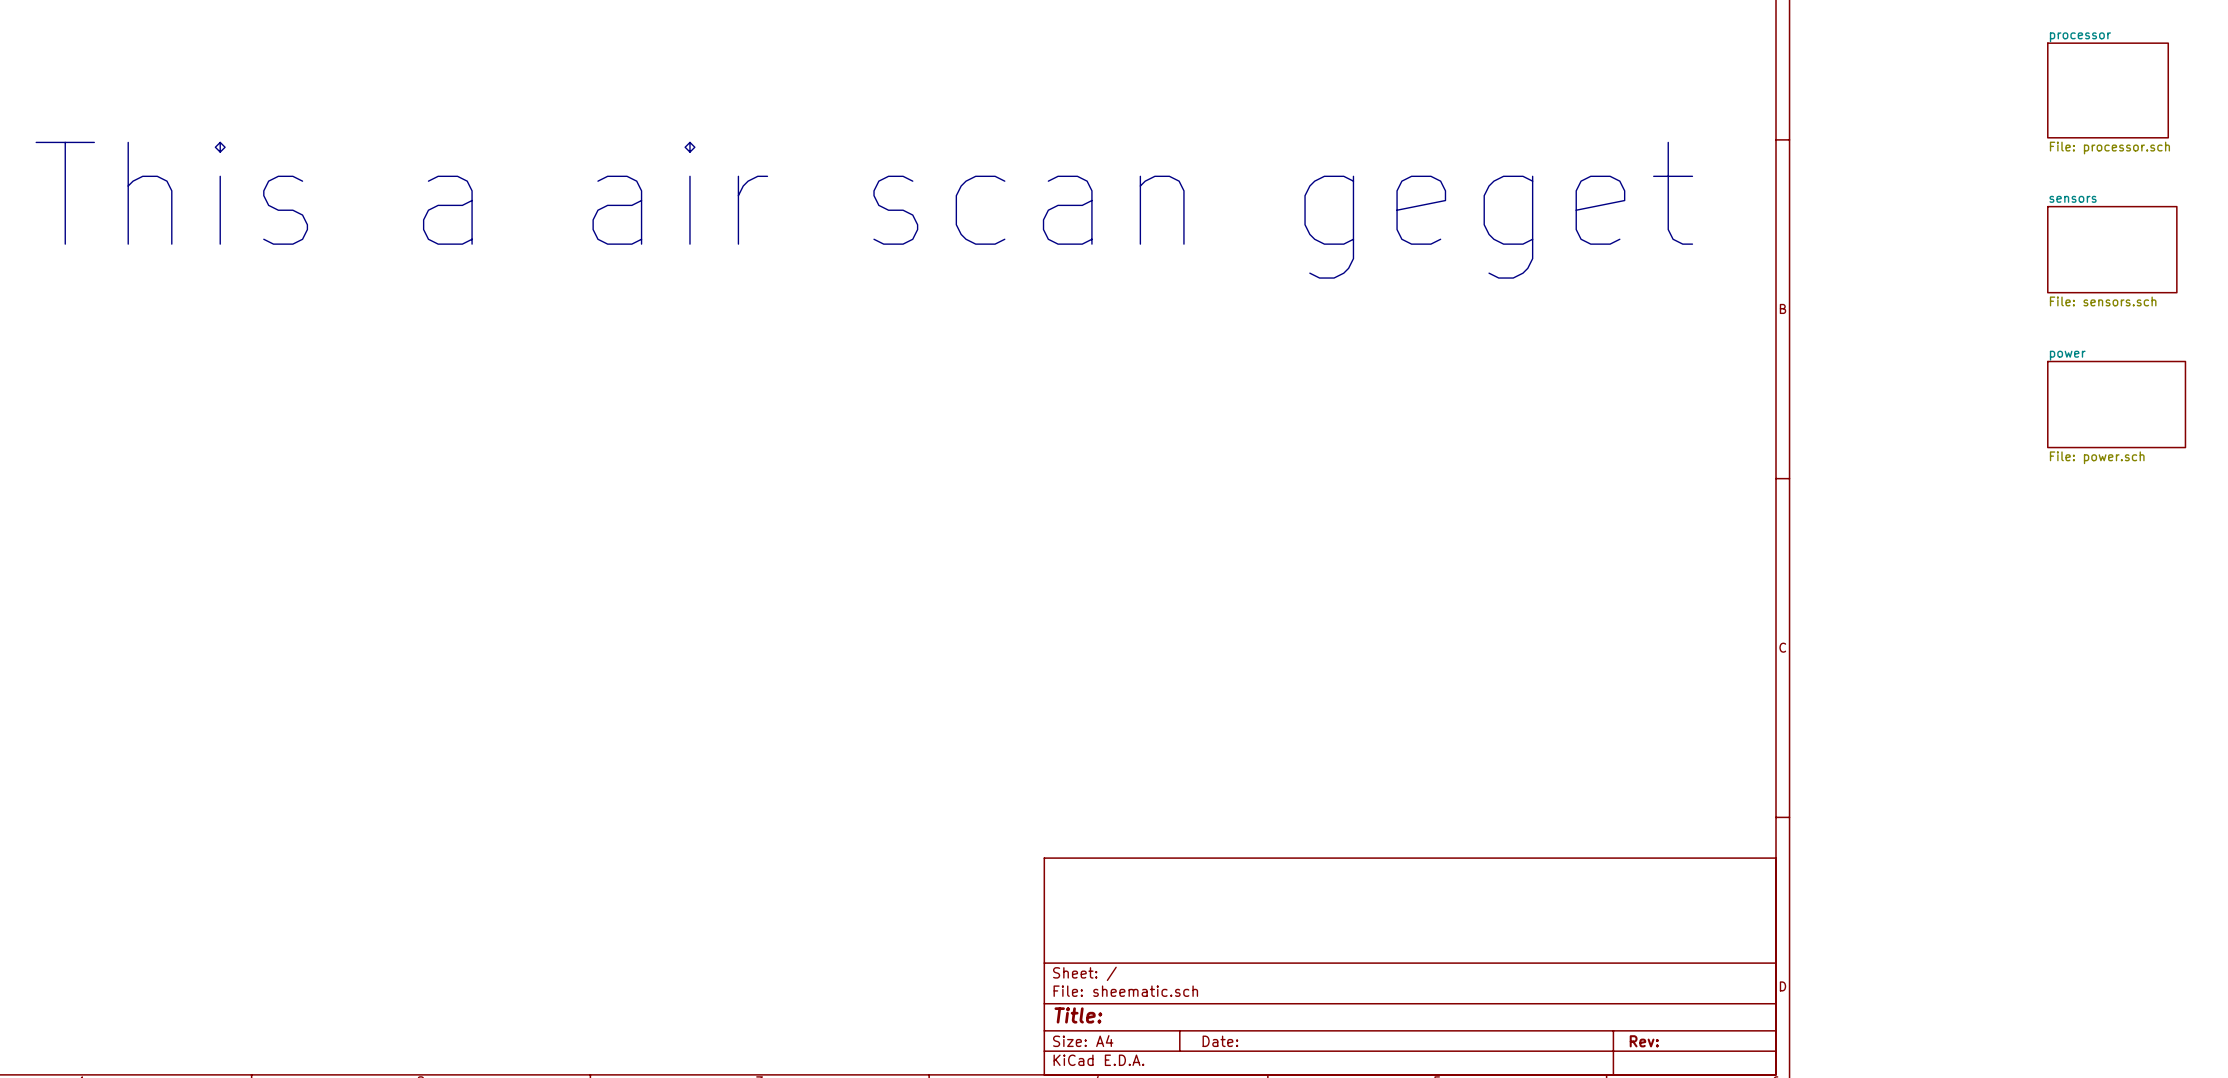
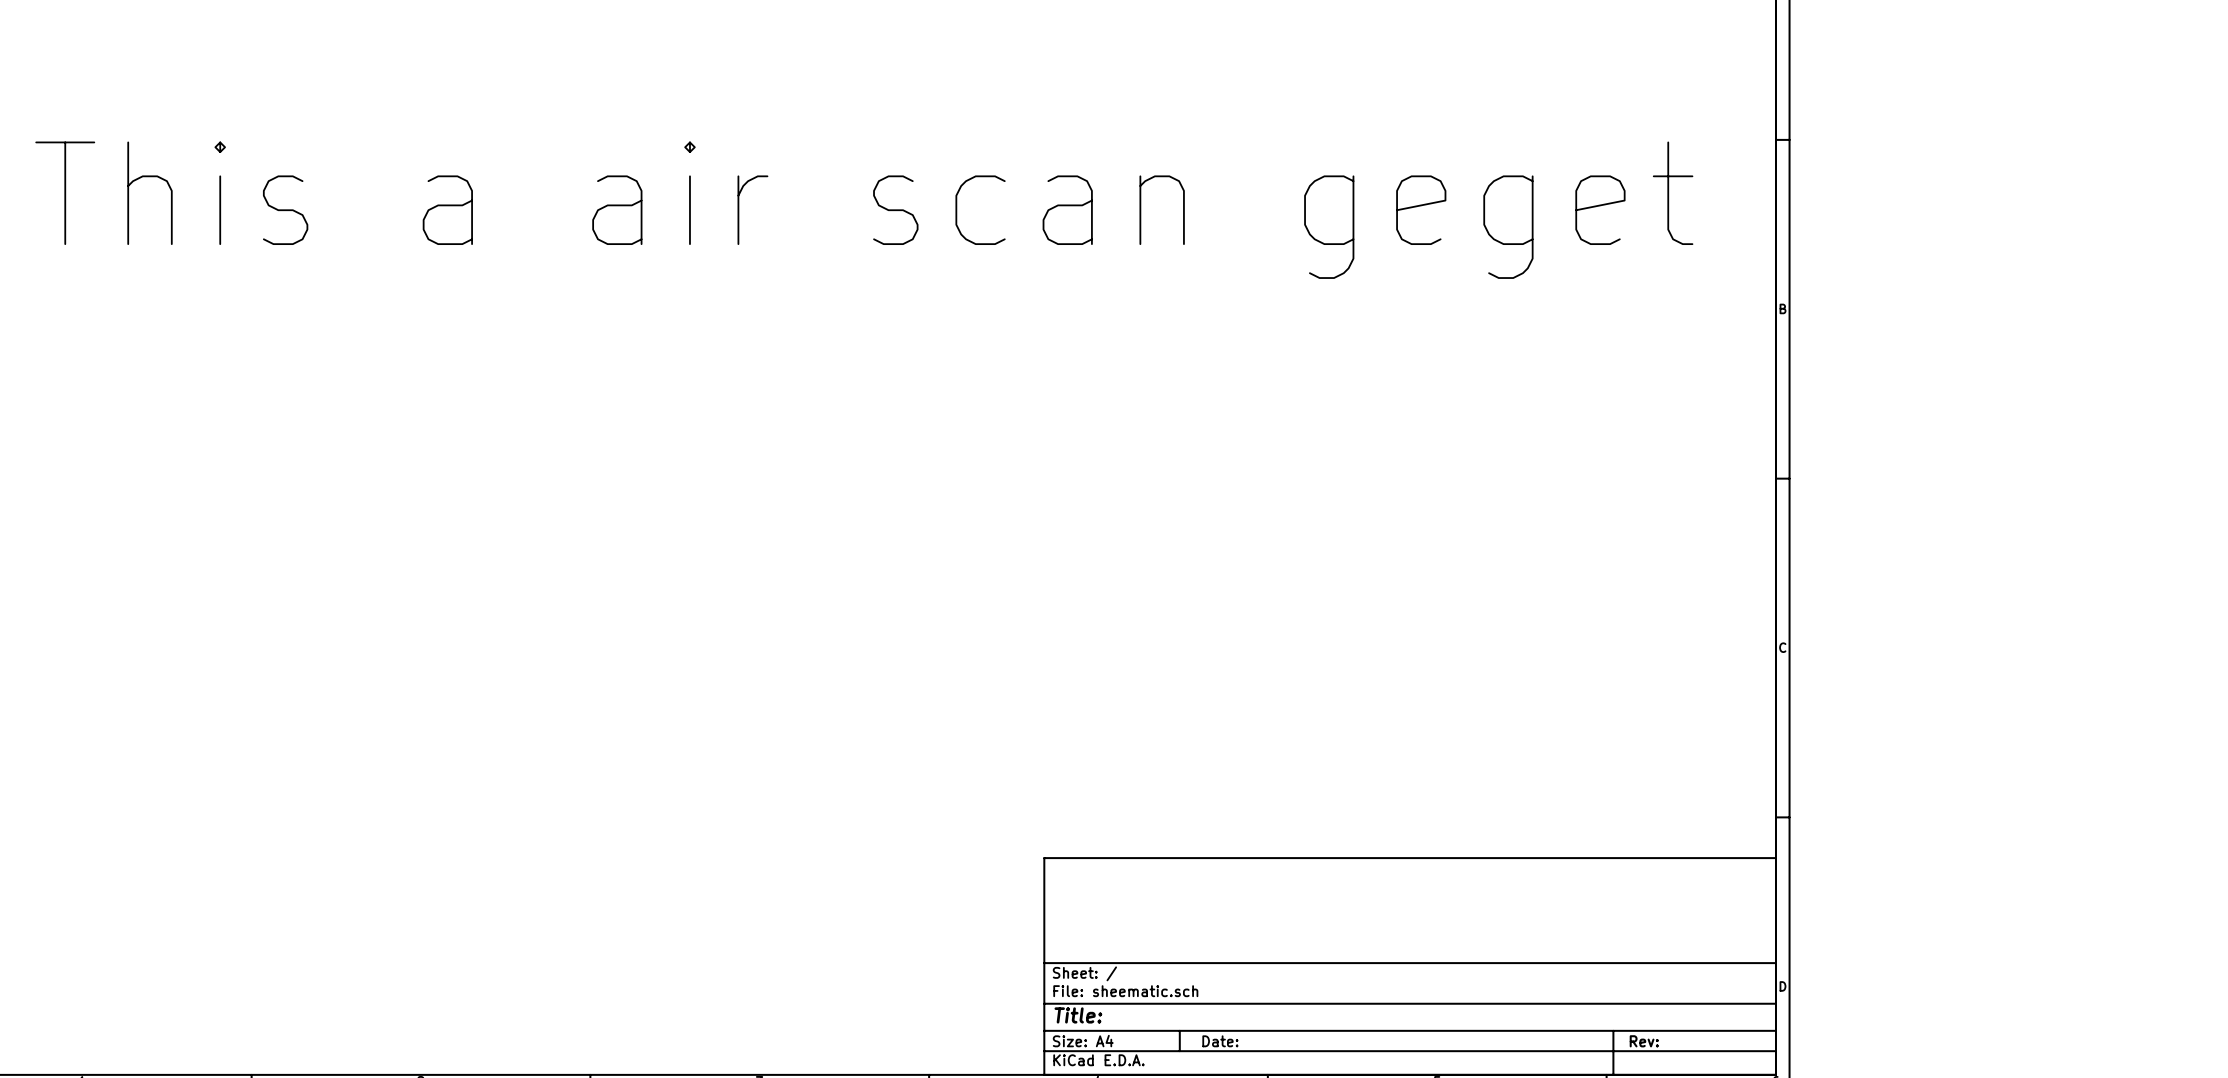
sheet processor: File: processor.sch (2108, 90) -> none
sheet sensors: File: sensors.sch (2112, 249) -> none
sheet power: File: power.sch (2116, 404) -> none

